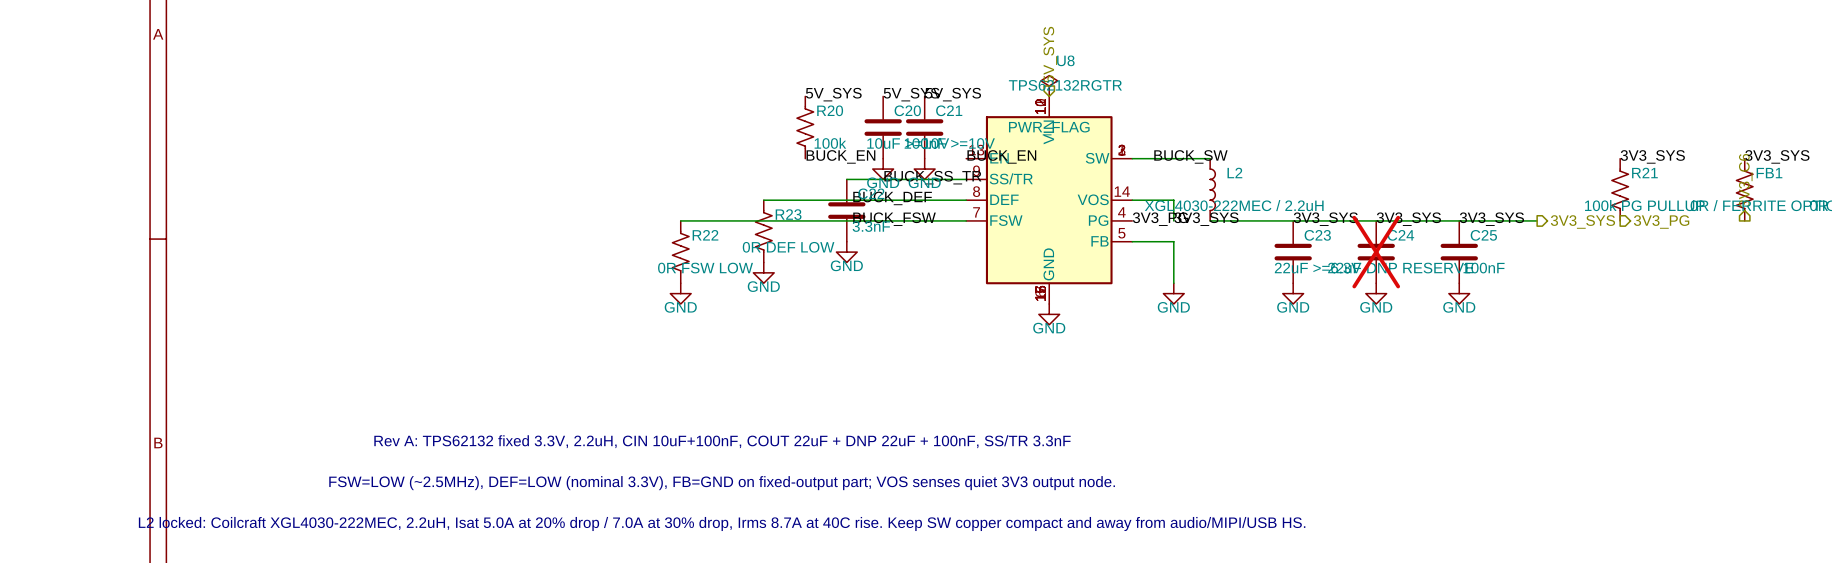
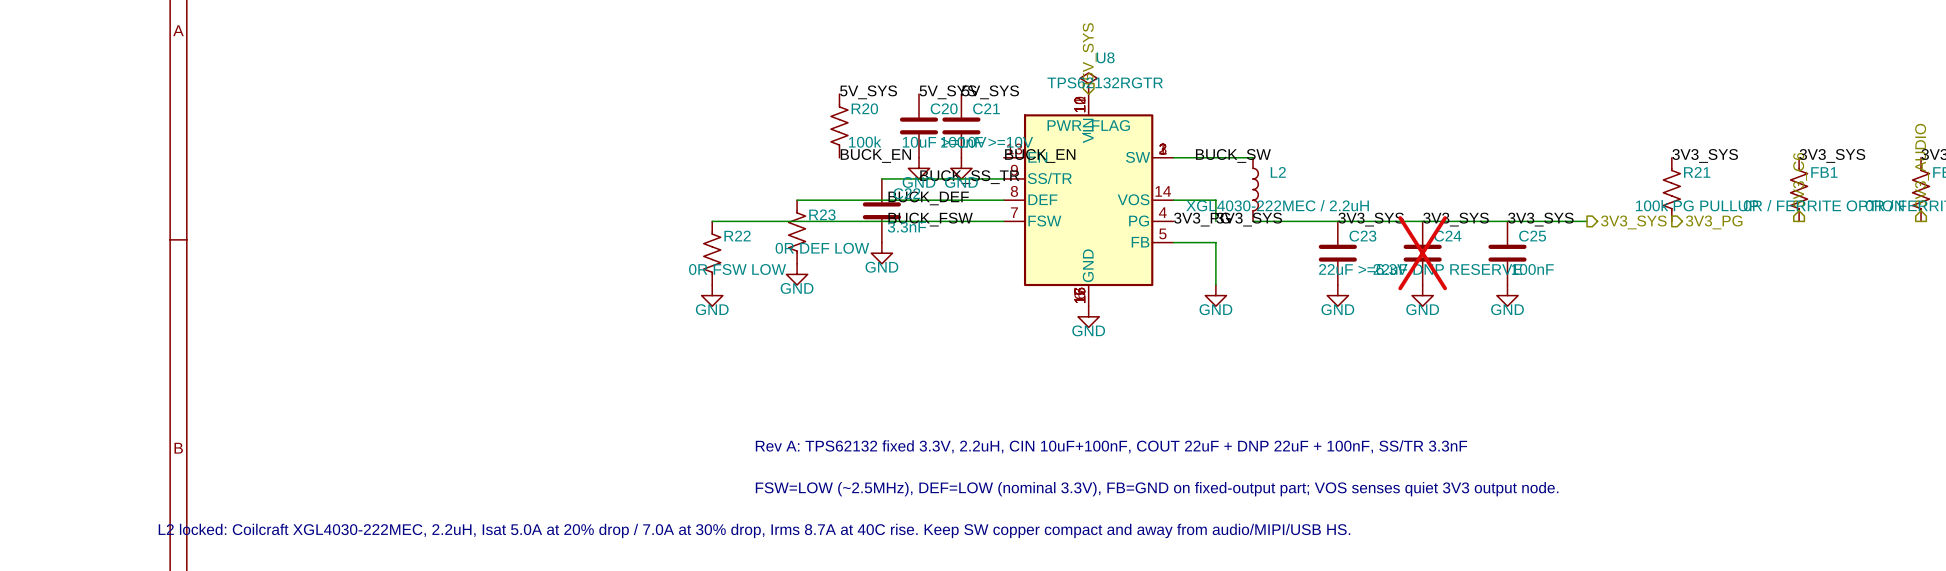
text position: Rev A: TPS62132 fixed 3.3V, 2.2uH, CIN 10uF+100nF, COUT 22uF + DNP 22uF + 100nF, SS/TR 3.3nF (722, 441) -> Rev A: TPS62132 fixed 3.3V, 2.2uH, CIN 10uF+100nF, COUT 22uF + DNP 22uF + 100nF, SS/TR 3.3nF (1111, 446)
text position: FSW=LOW (~2.5MHz), DEF=LOW (nominal 3.3V), FB=GND on fixed-output part; VOS senses quiet 3V3 output node. (722, 483) -> FSW=LOW (~2.5MHz), DEF=LOW (nominal 3.3V), FB=GND on fixed-output part; VOS senses quiet 3V3 output node. (1157, 489)

